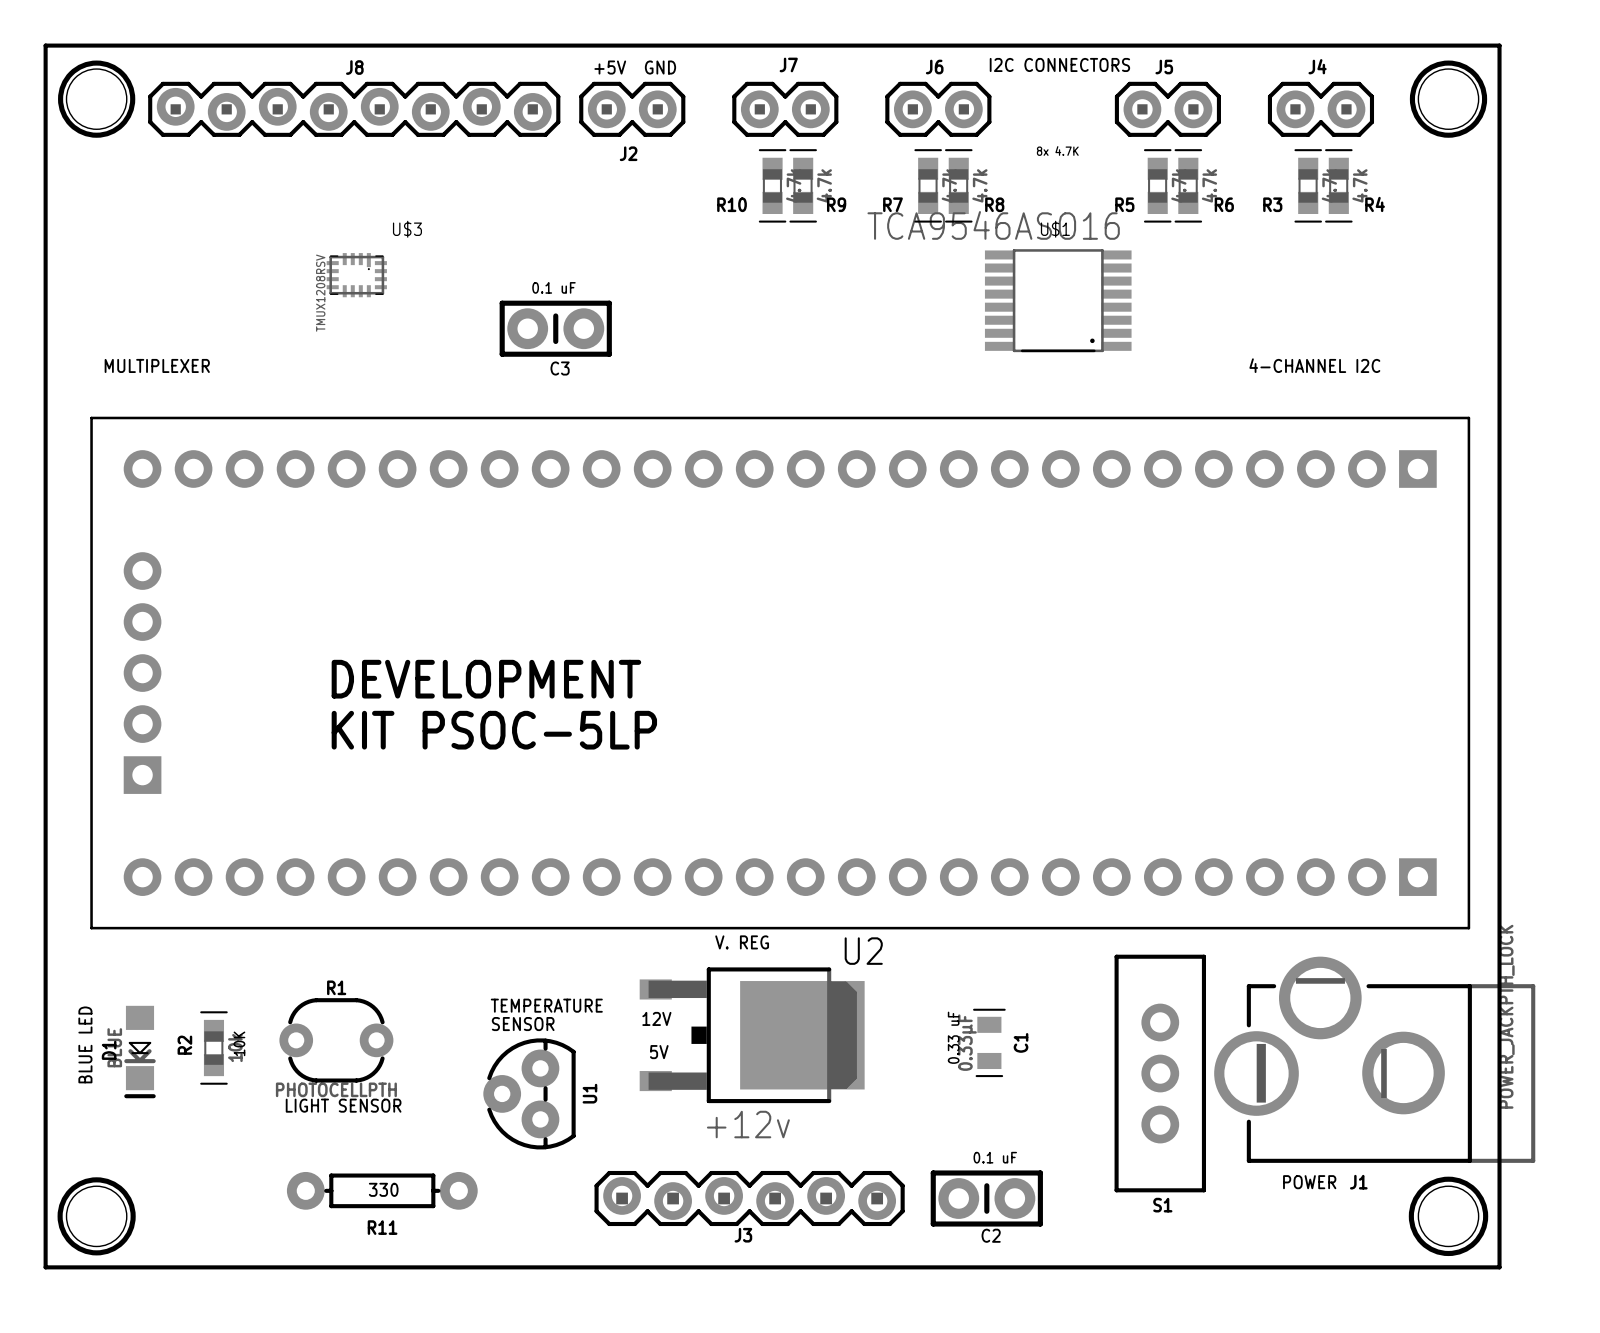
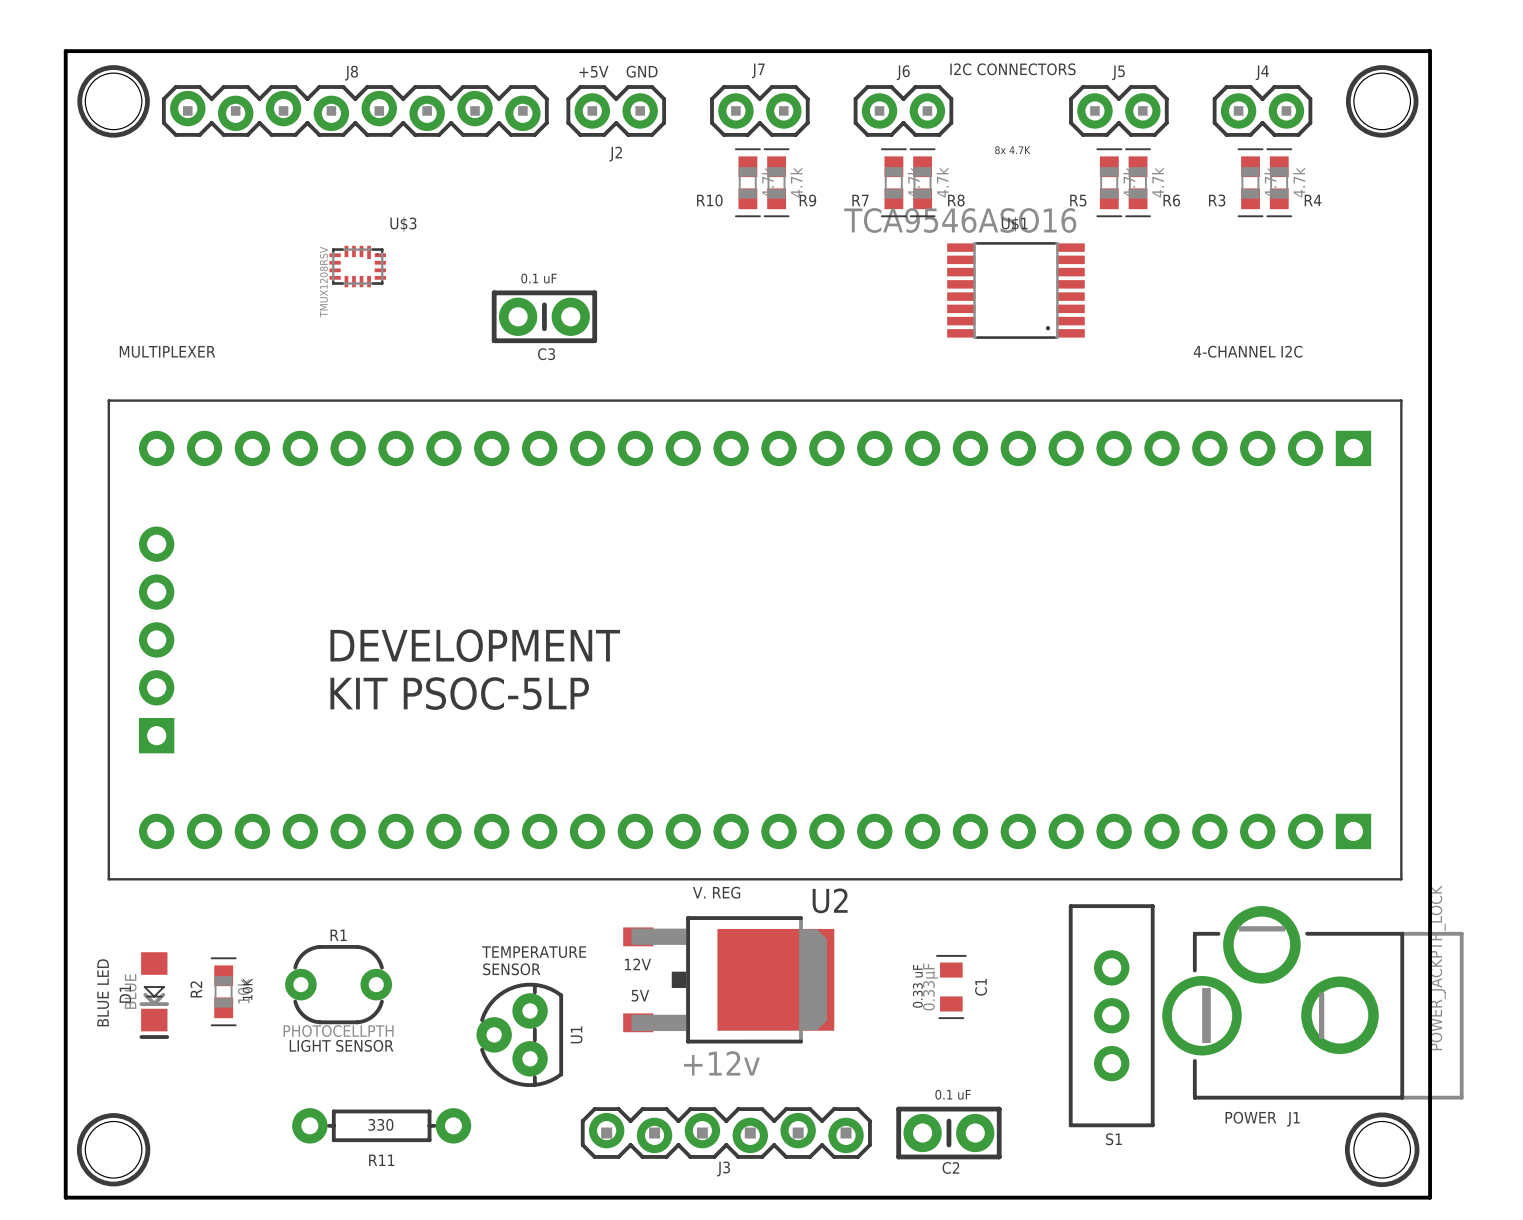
U$1 footprint: [984, 249, 1132, 353] -> [947, 242, 1085, 339]
U$3 footprint: [326, 253, 387, 298] -> [329, 245, 387, 288]

